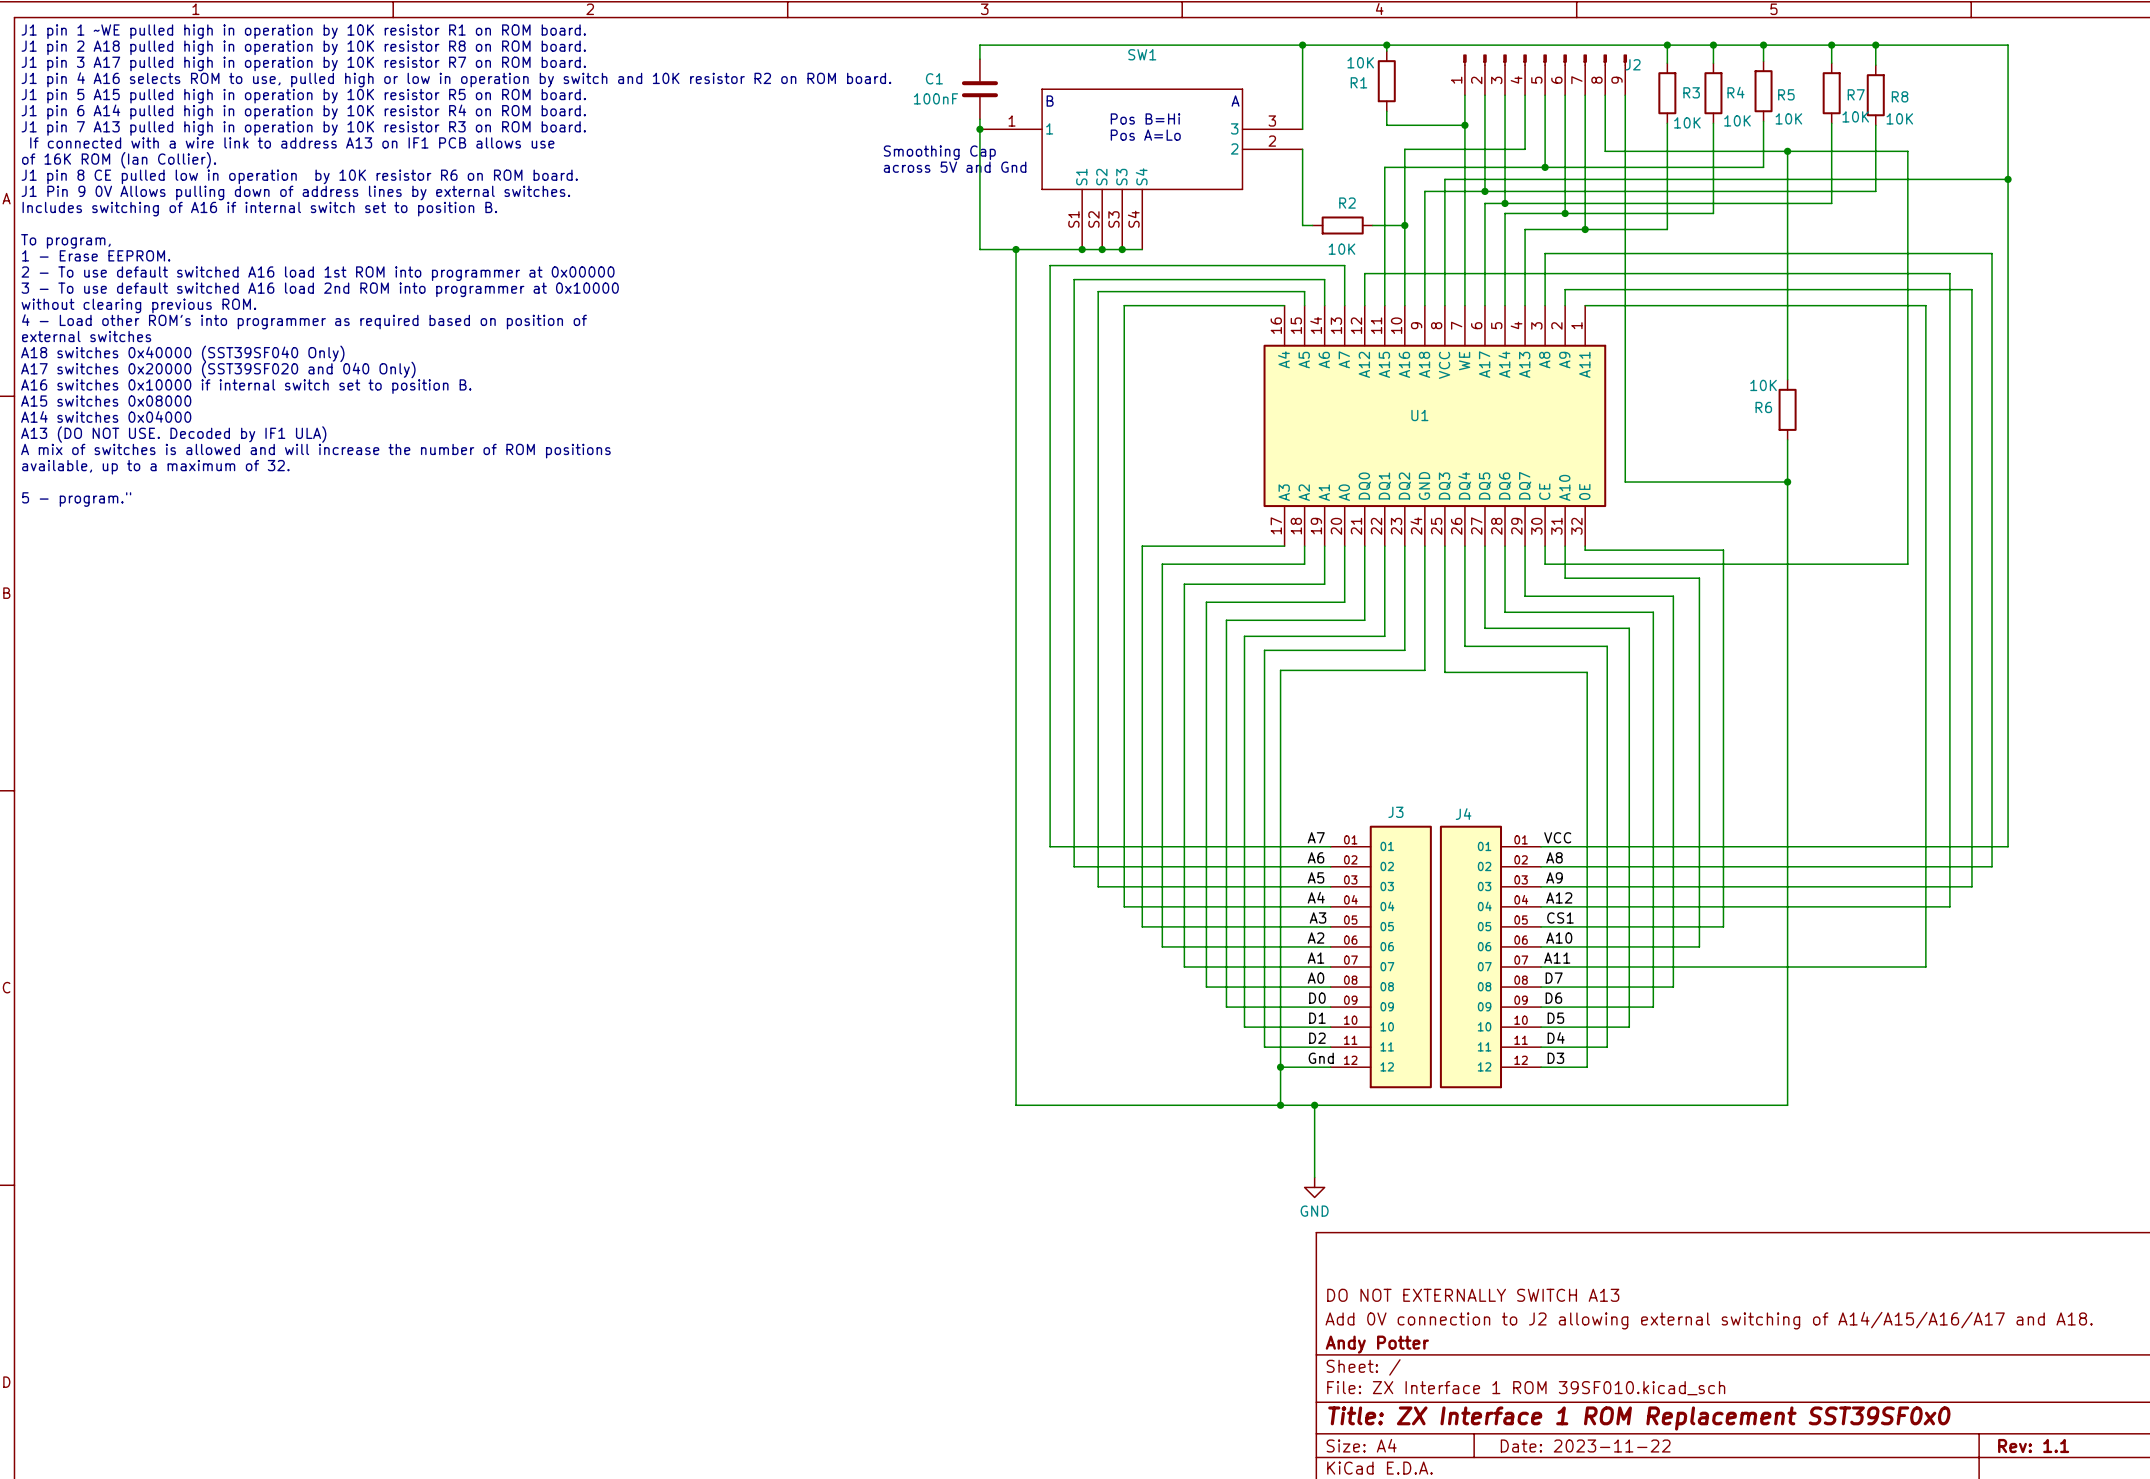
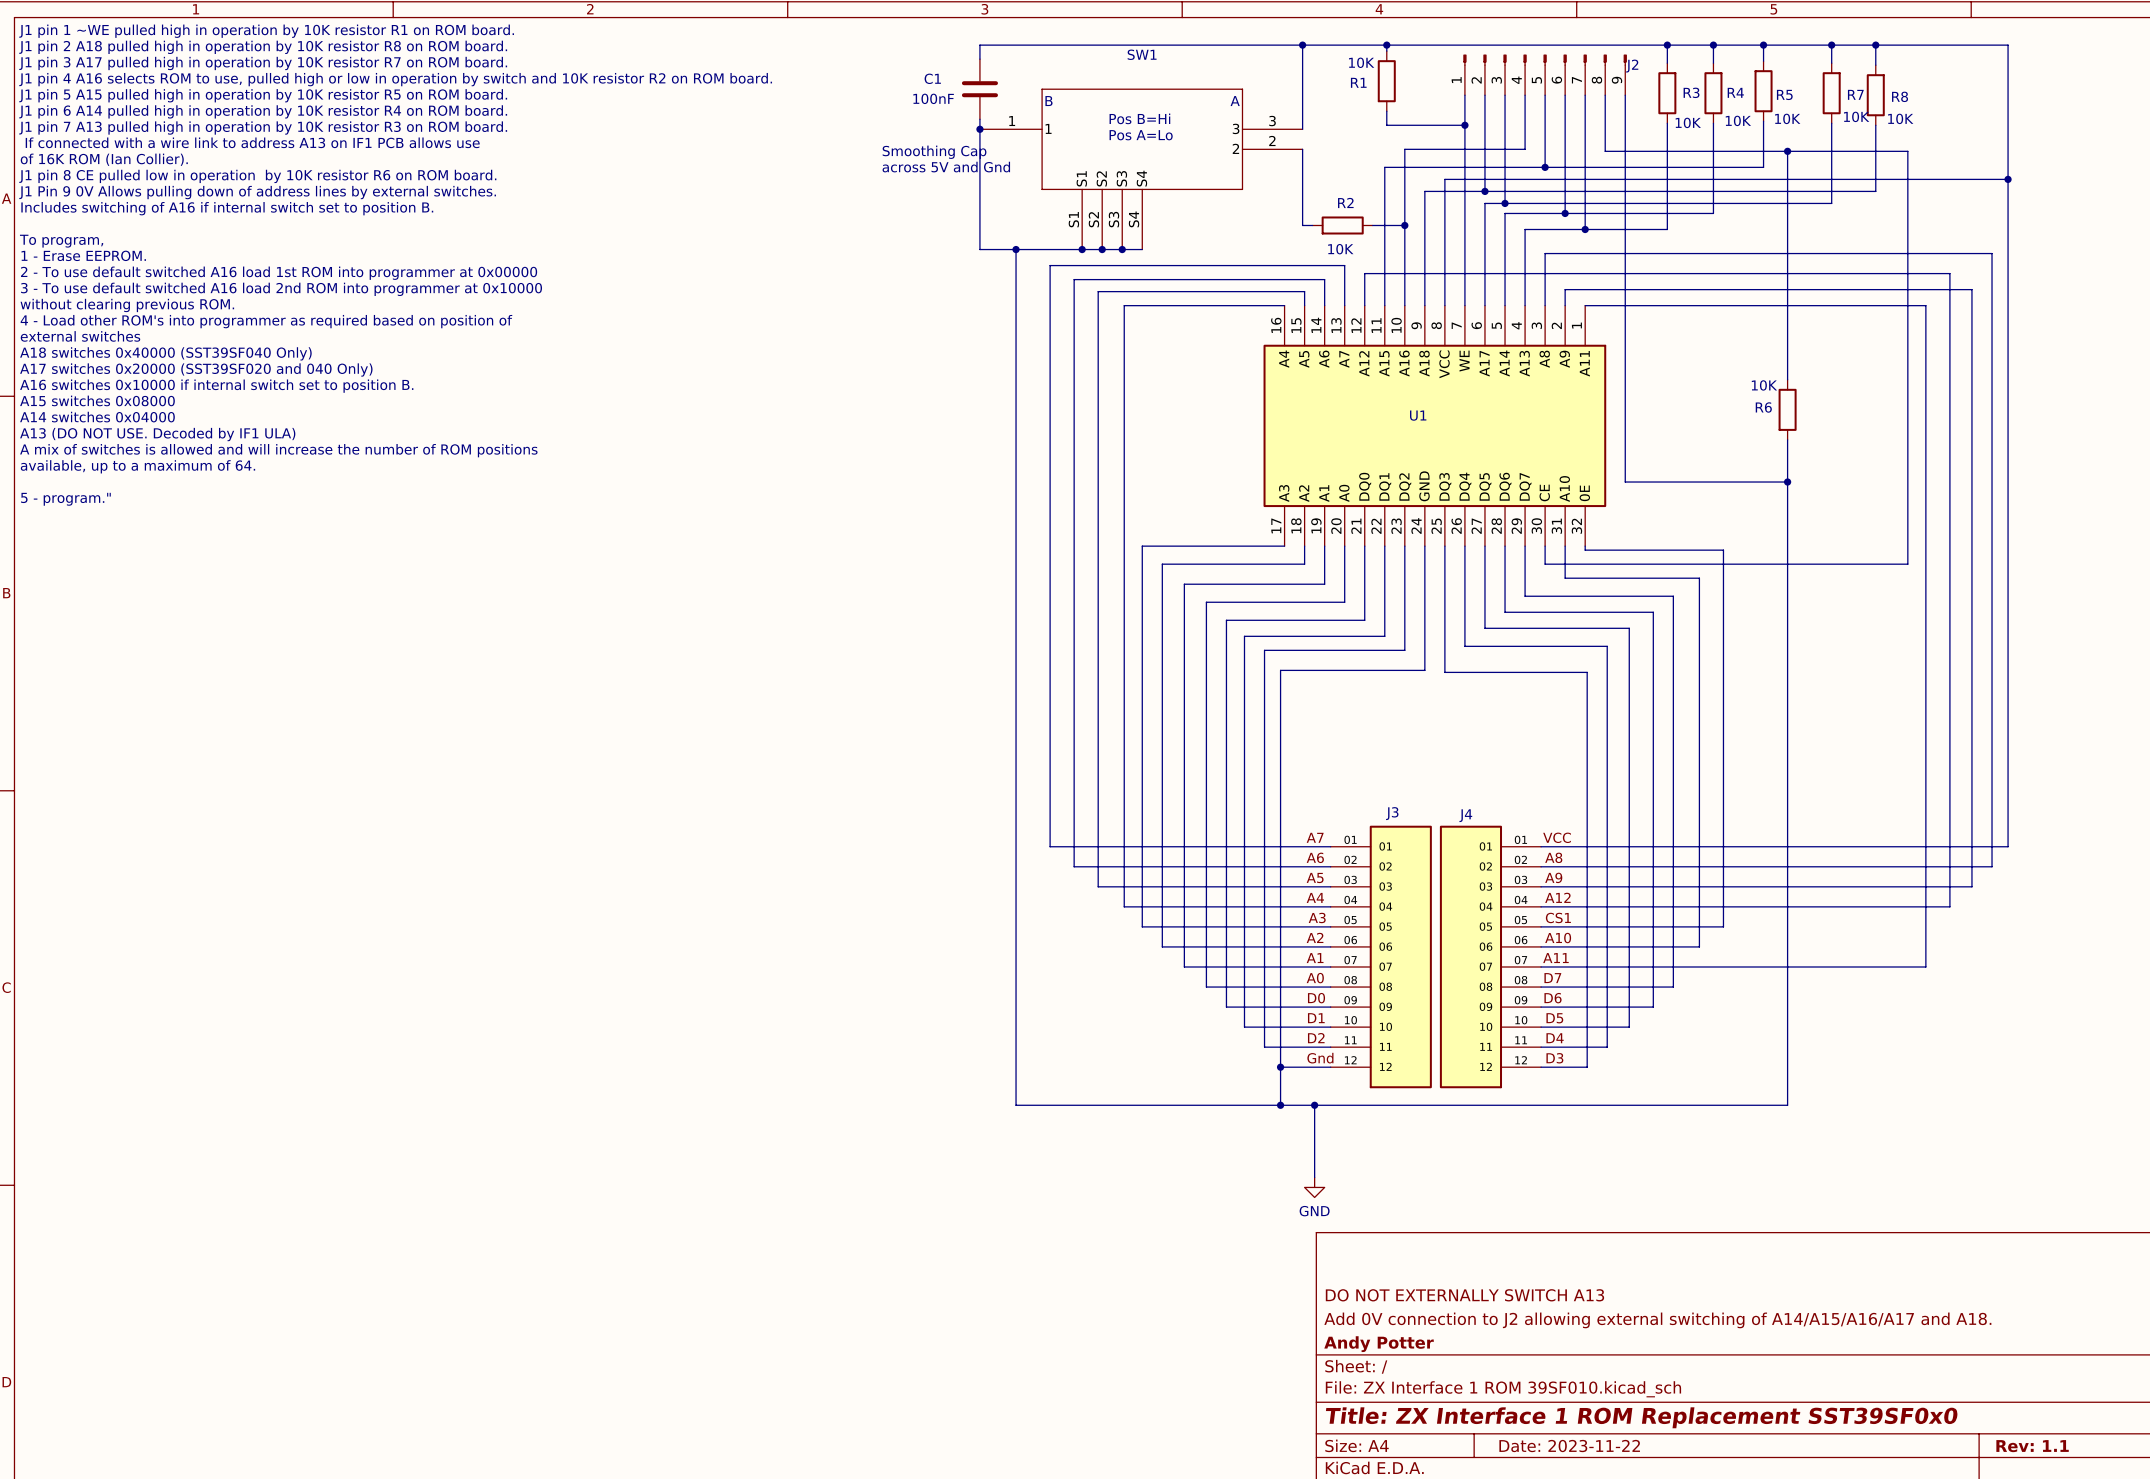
text: available, up to a maximum of 32. (155, 467) -> available, up to a maximum of 64. (137, 466)

